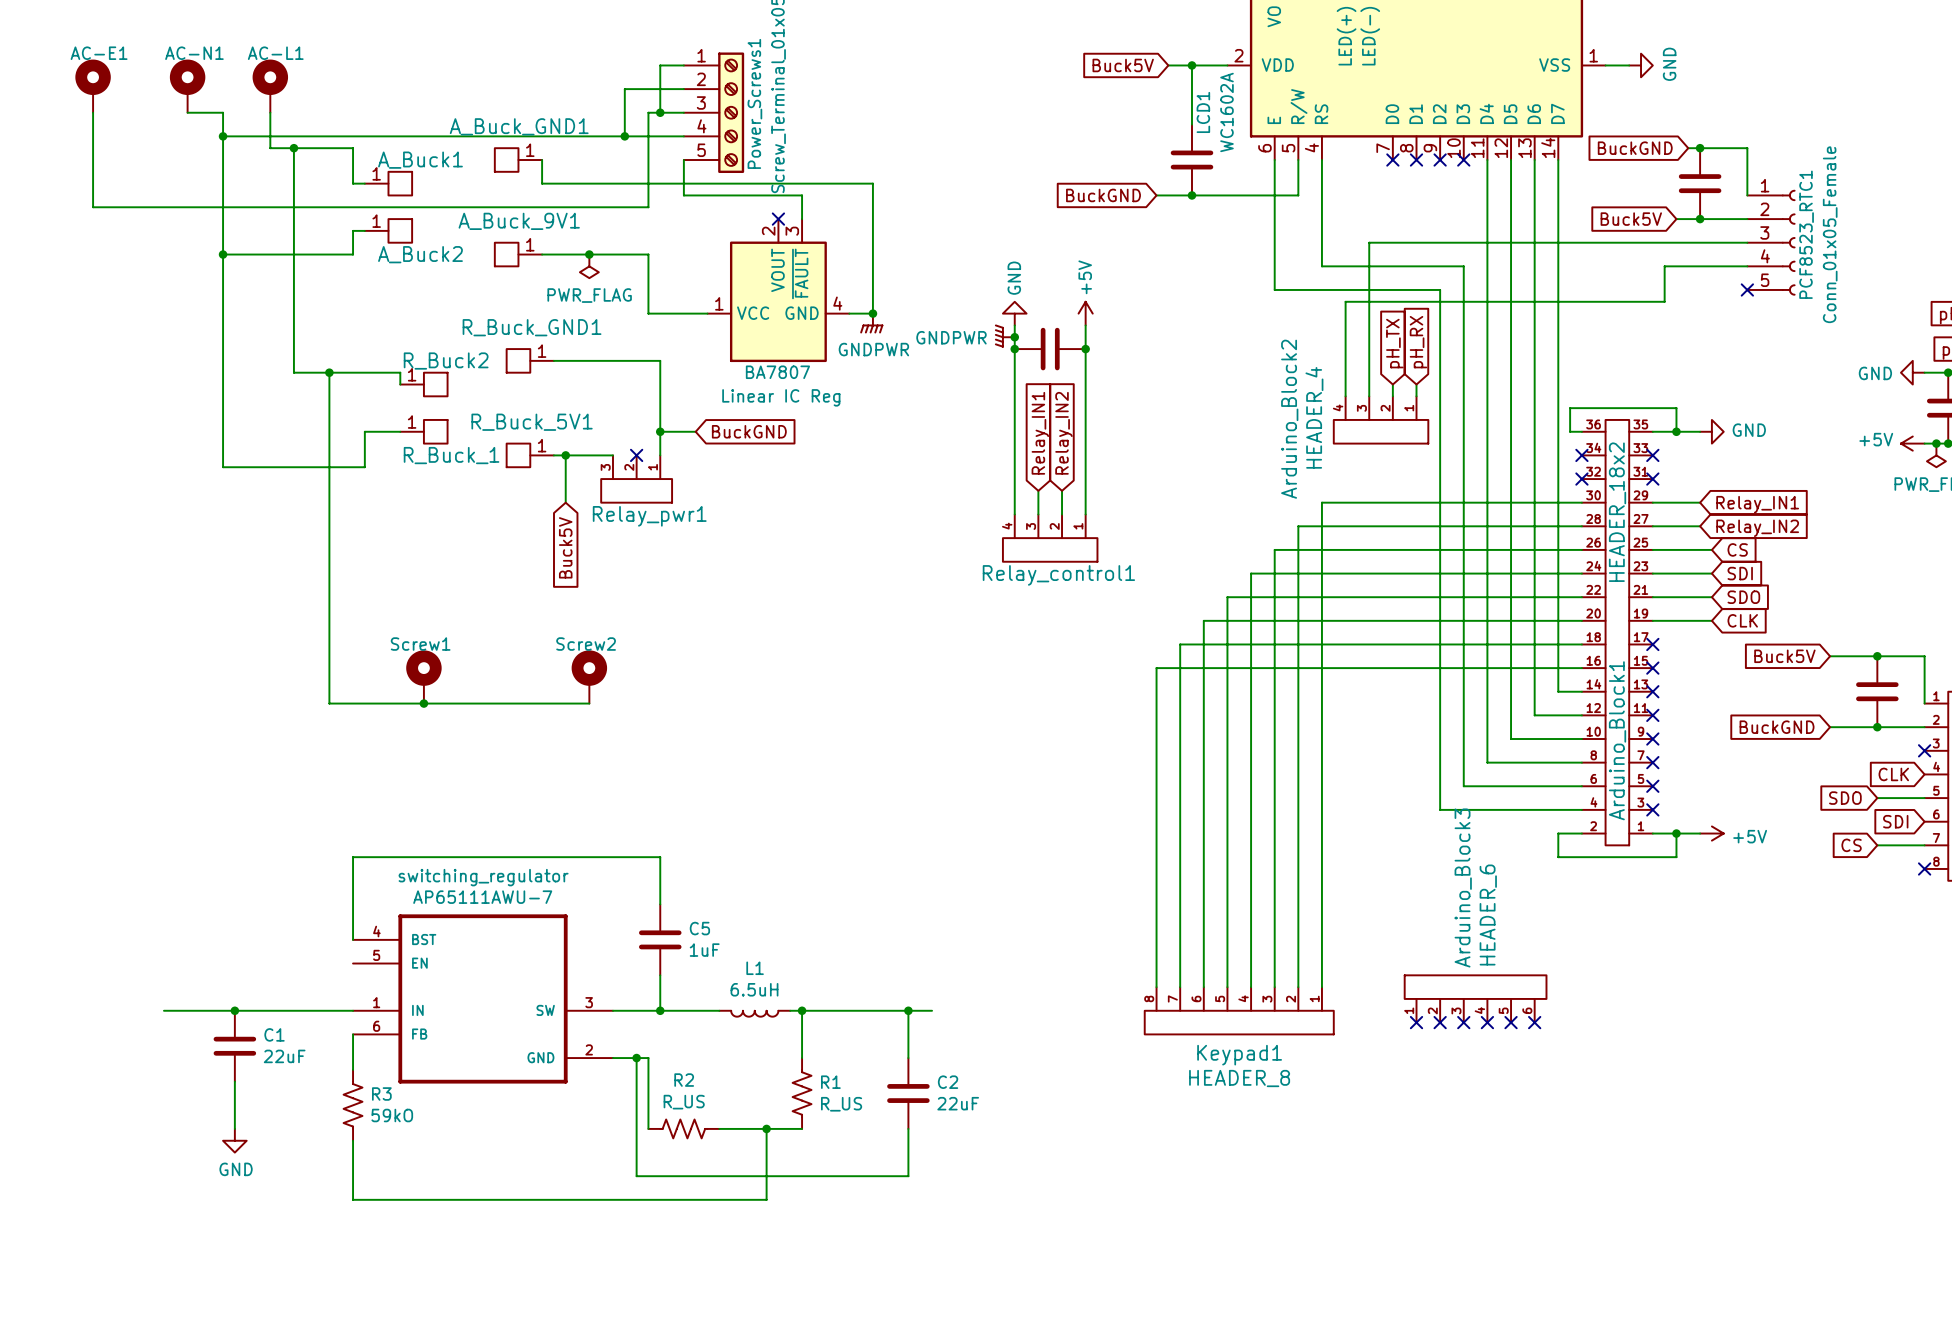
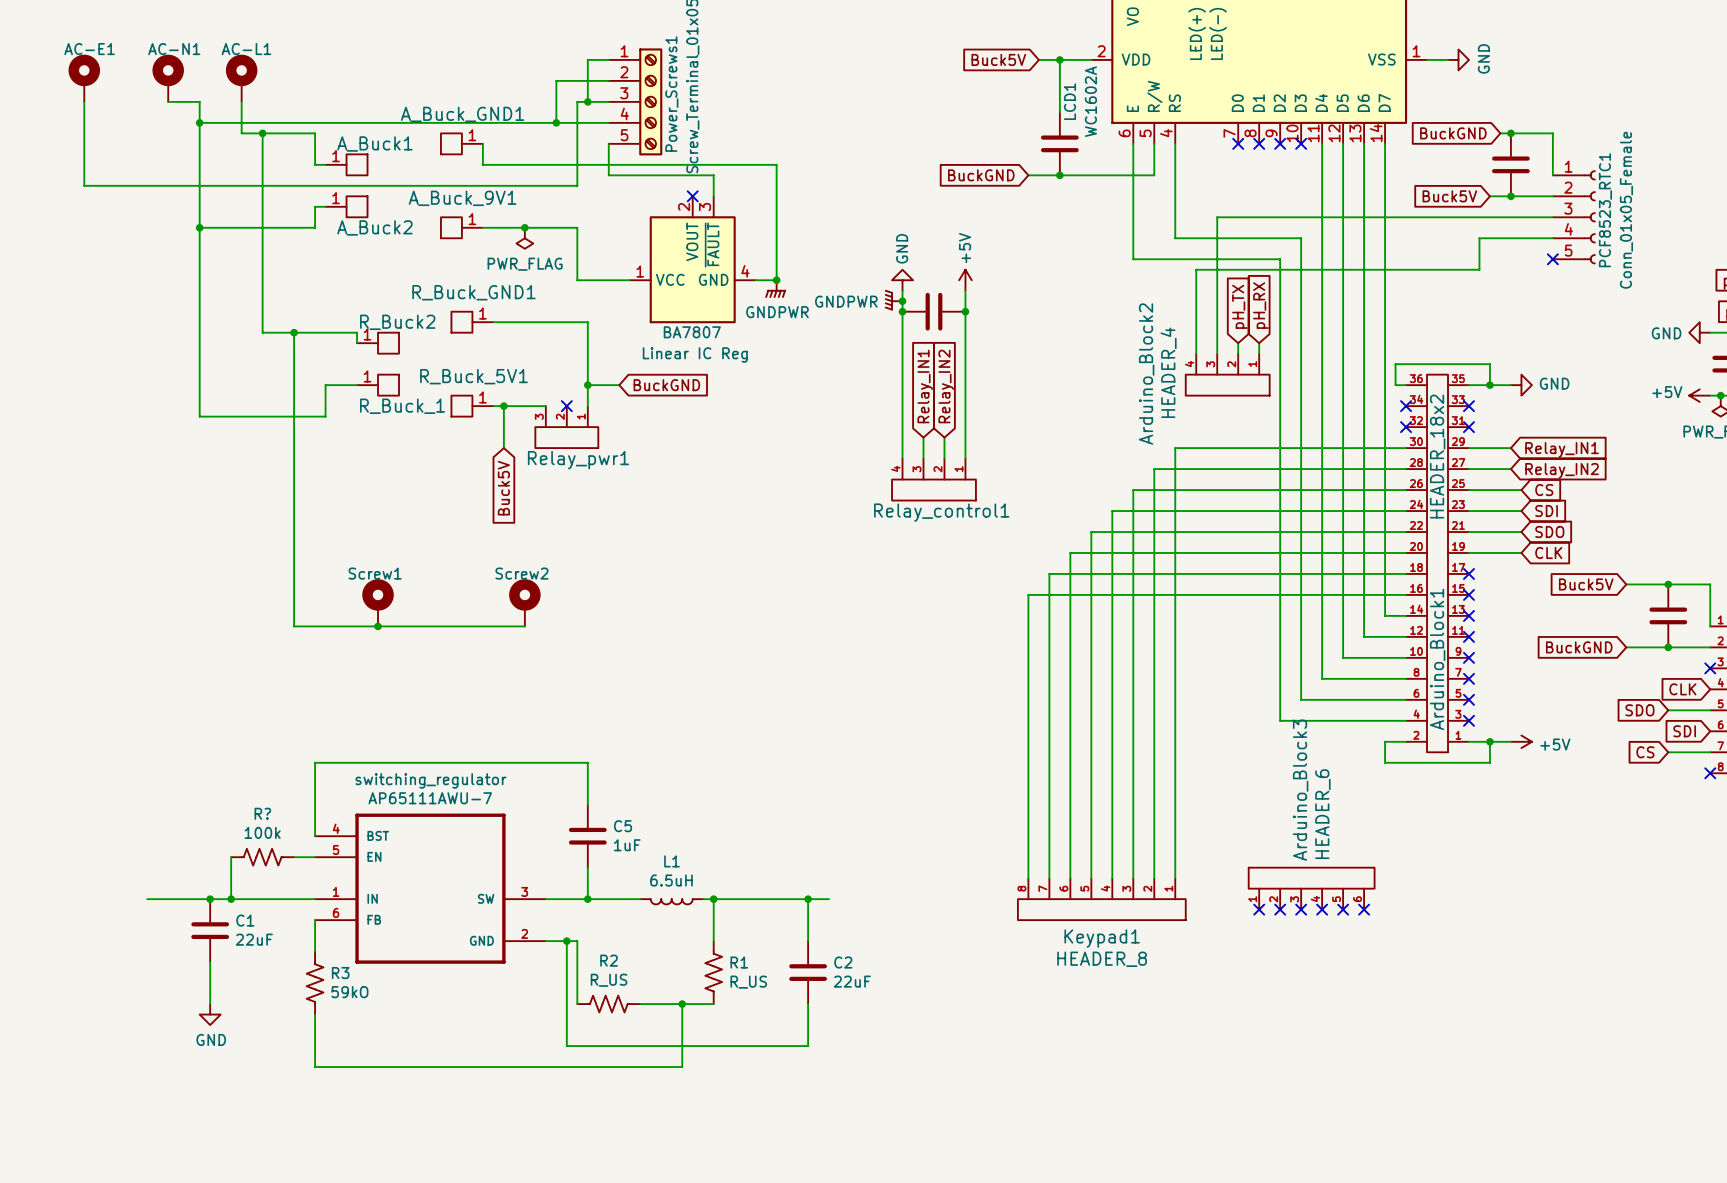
wire: none -> (231, 857) (231, 899)
R?: none -> 100k (262, 857)
wire: none -> (294, 857) (315, 857)
junction: none -> (231, 899)

